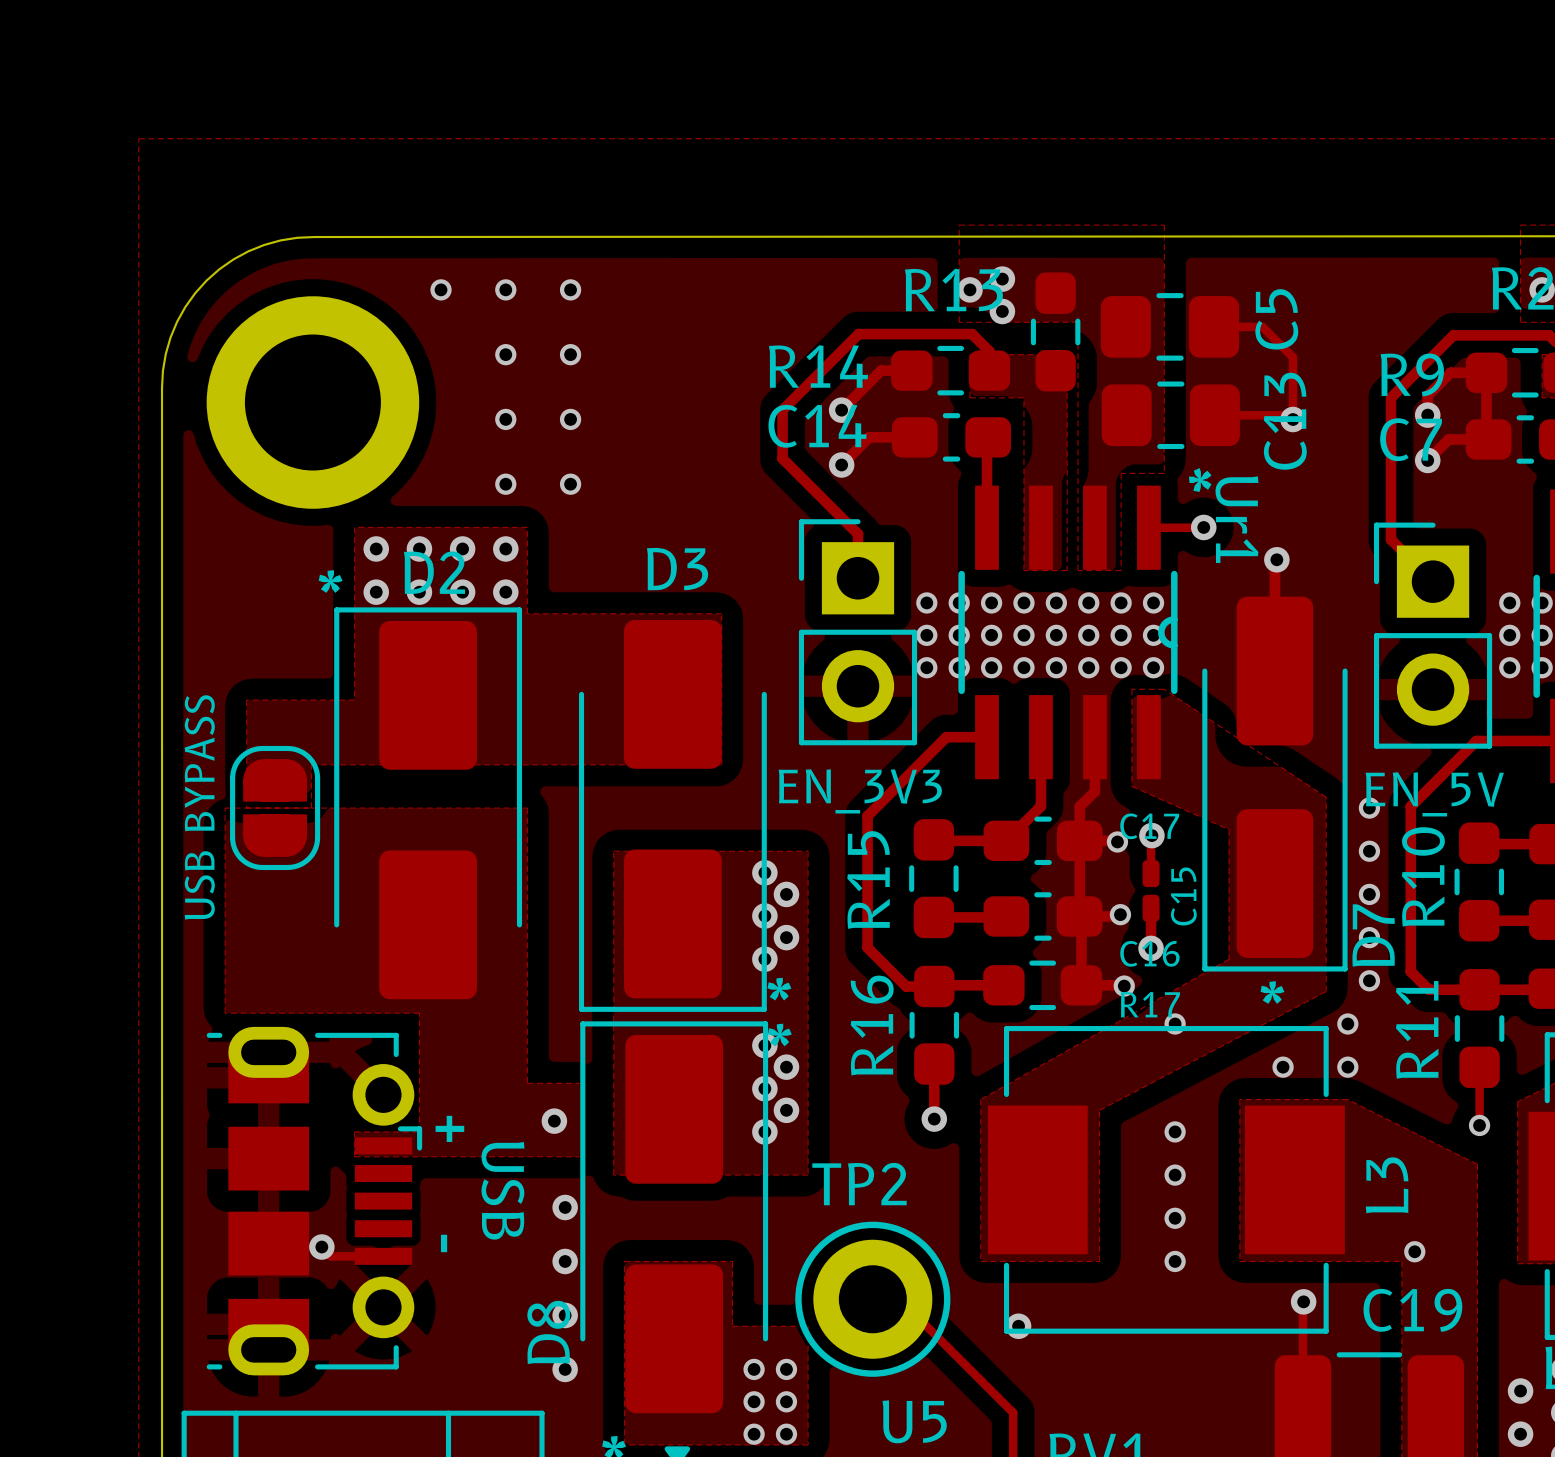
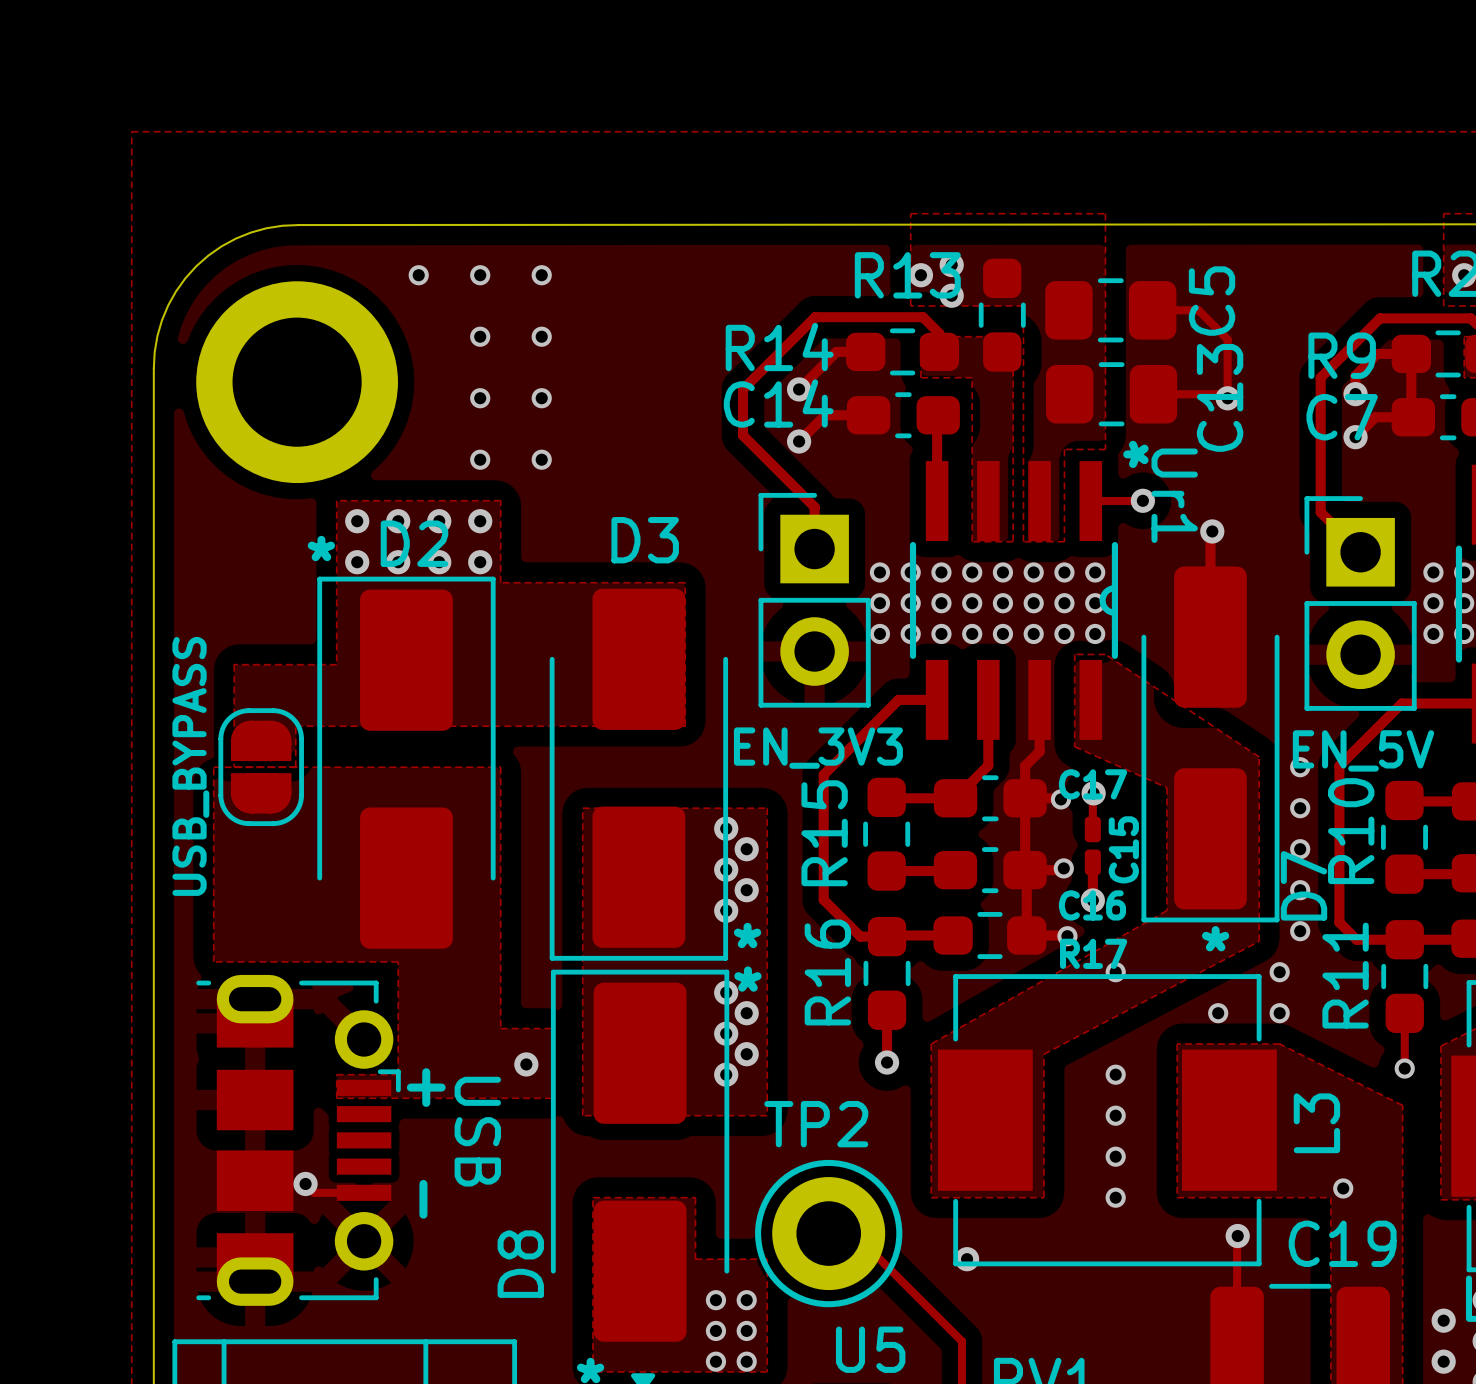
part text: USB BYPASS (199, 807) -> USB_BYPASS (190, 766)
via: (565, 1207) -> none
via: (565, 1261) -> none
via: (565, 1315) -> none
via: (565, 1369) -> none

